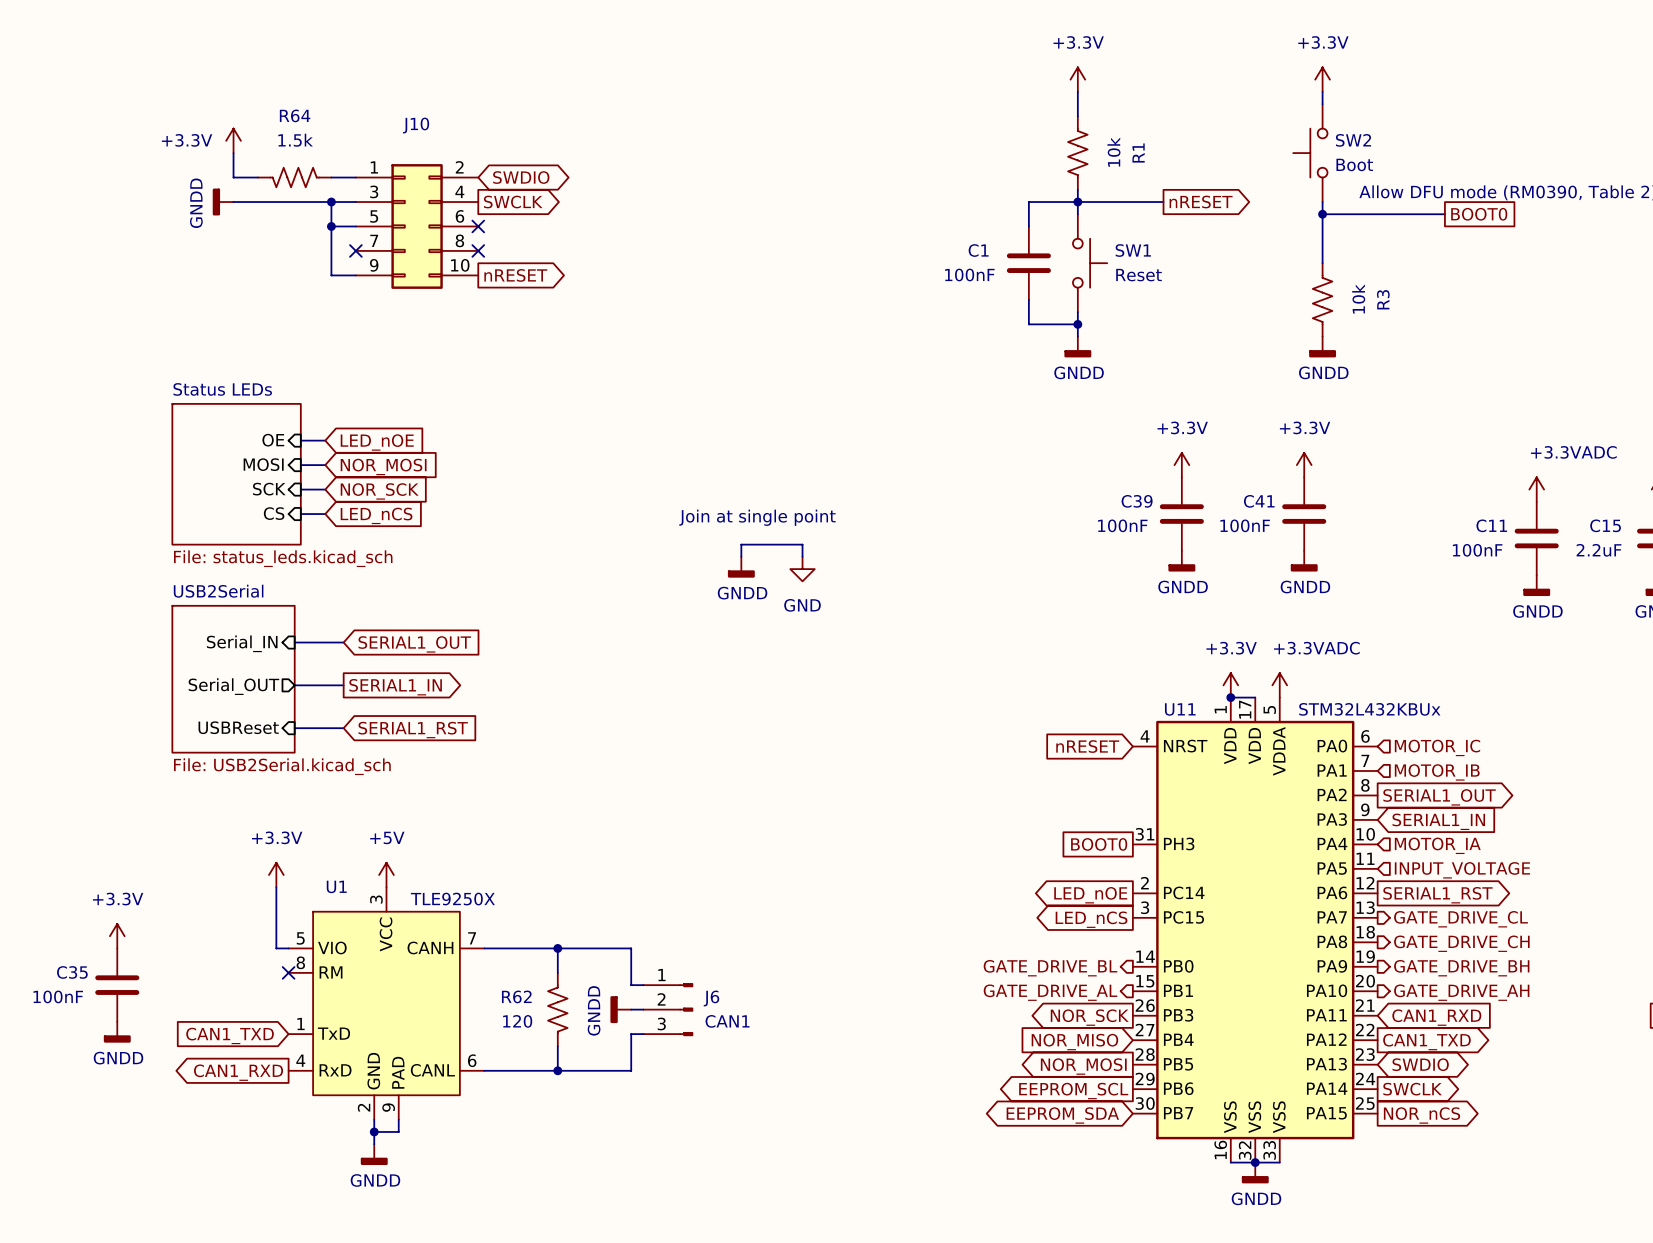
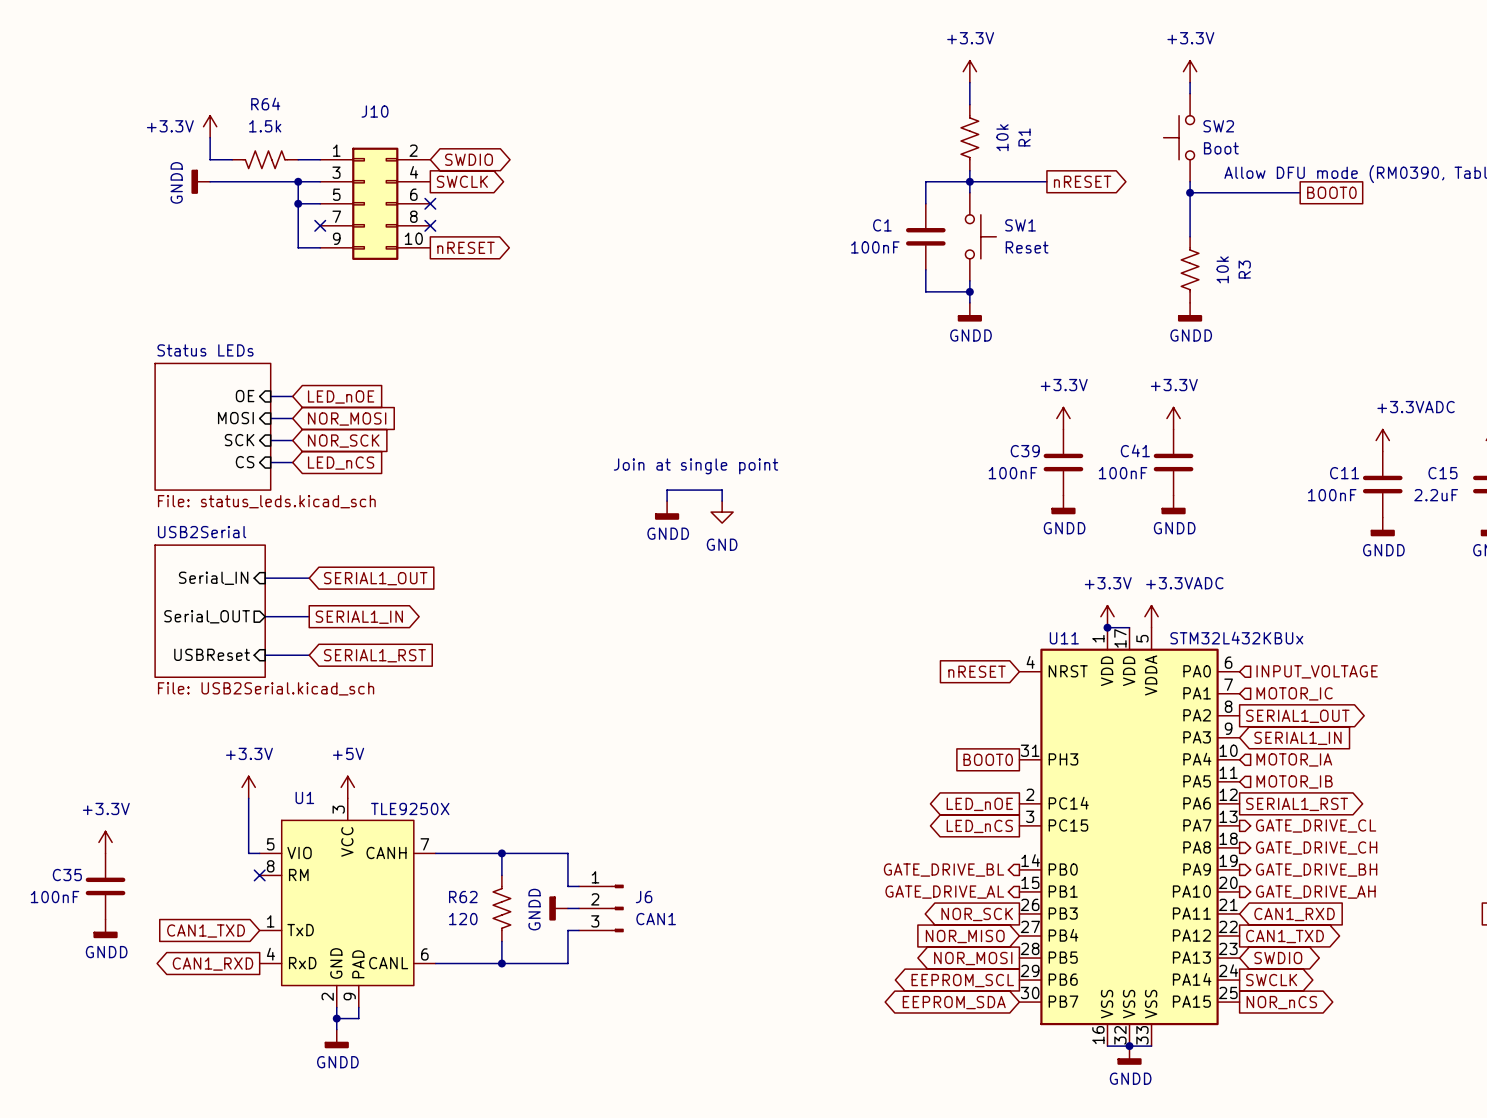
hierarchical label: MOTOR_IC (1437, 747) -> INPUT_VOLTAGE (1317, 671)
hierarchical label: MOTOR_IB (1437, 772) -> MOTOR_IC (1294, 693)
hierarchical label: INPUT_VOLTAGE (1462, 870) -> MOTOR_IB (1294, 781)

